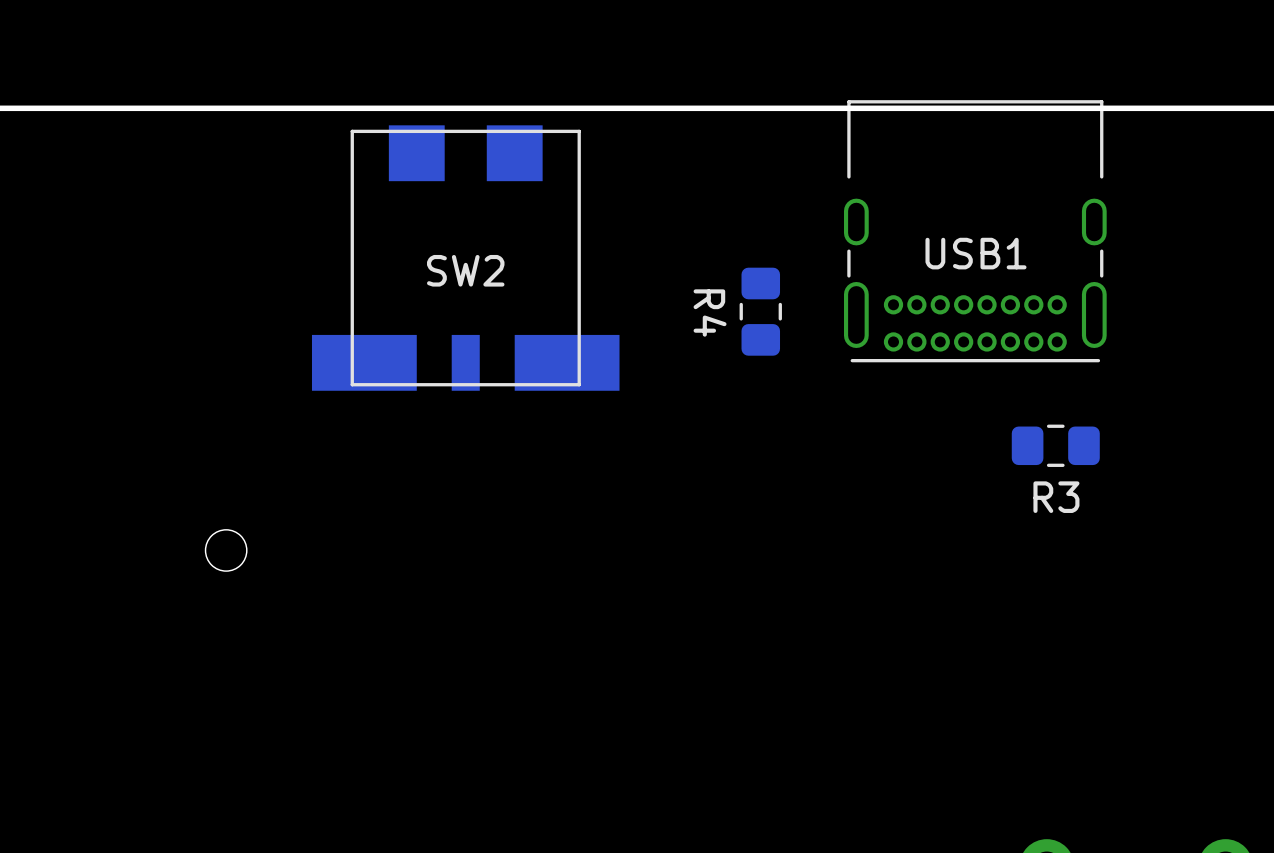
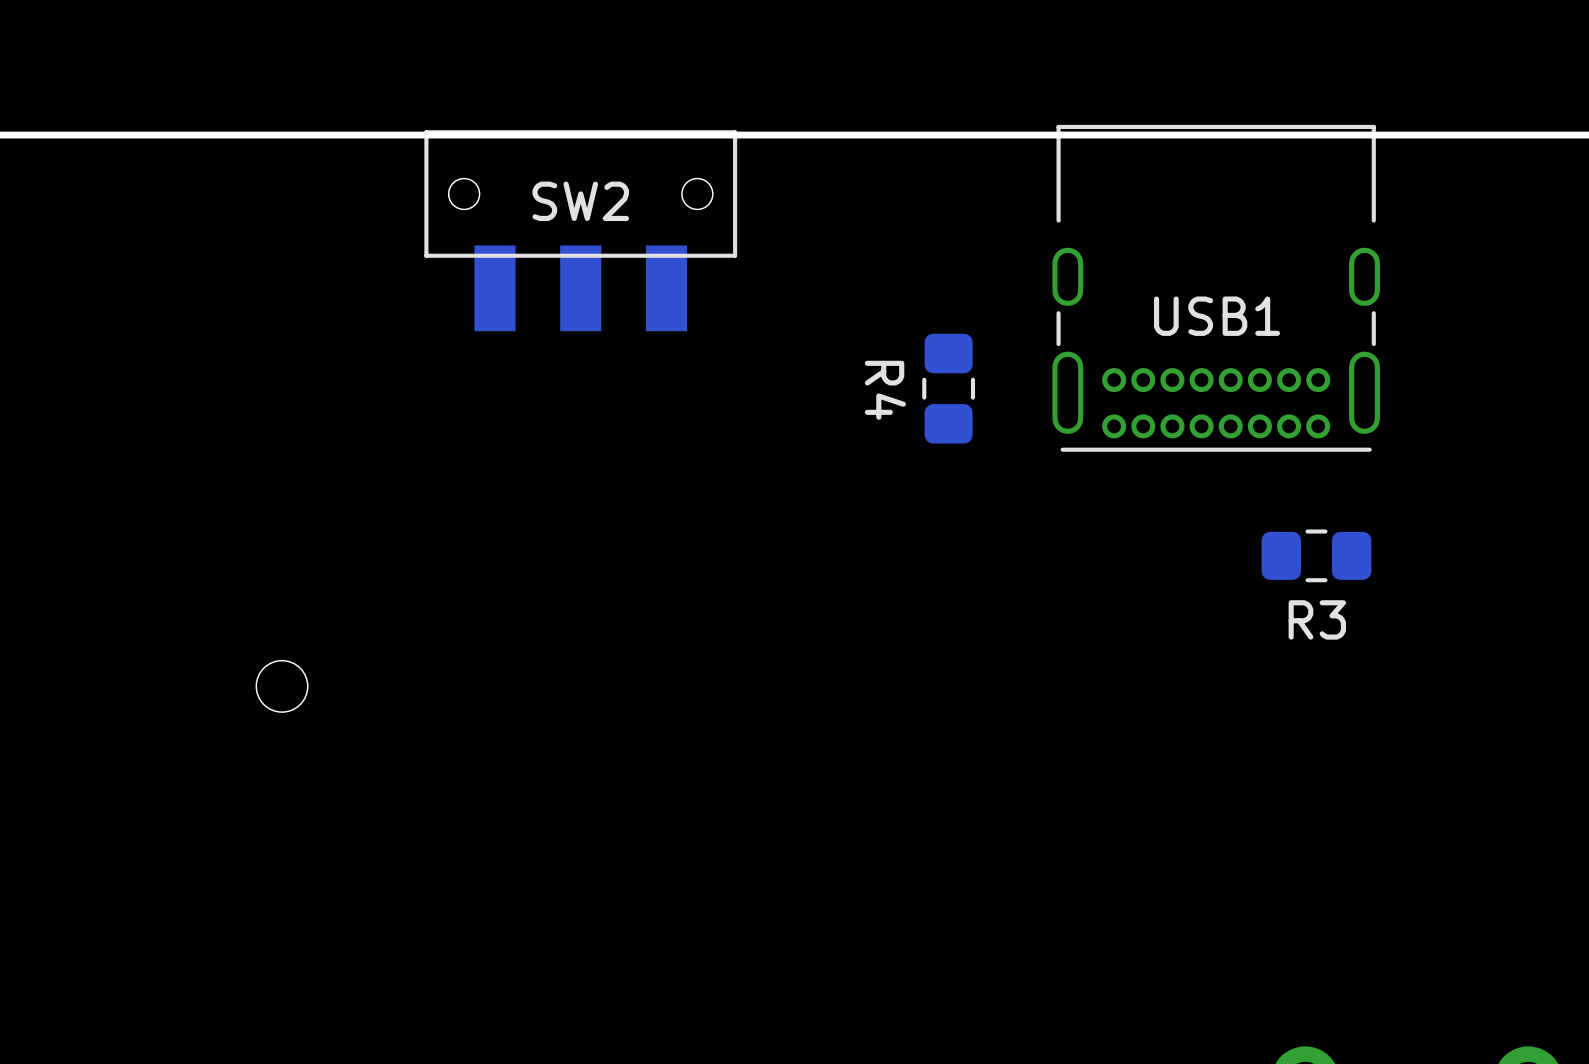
SW2 footprint: [311, 125, 620, 391] -> [424, 130, 738, 332]

